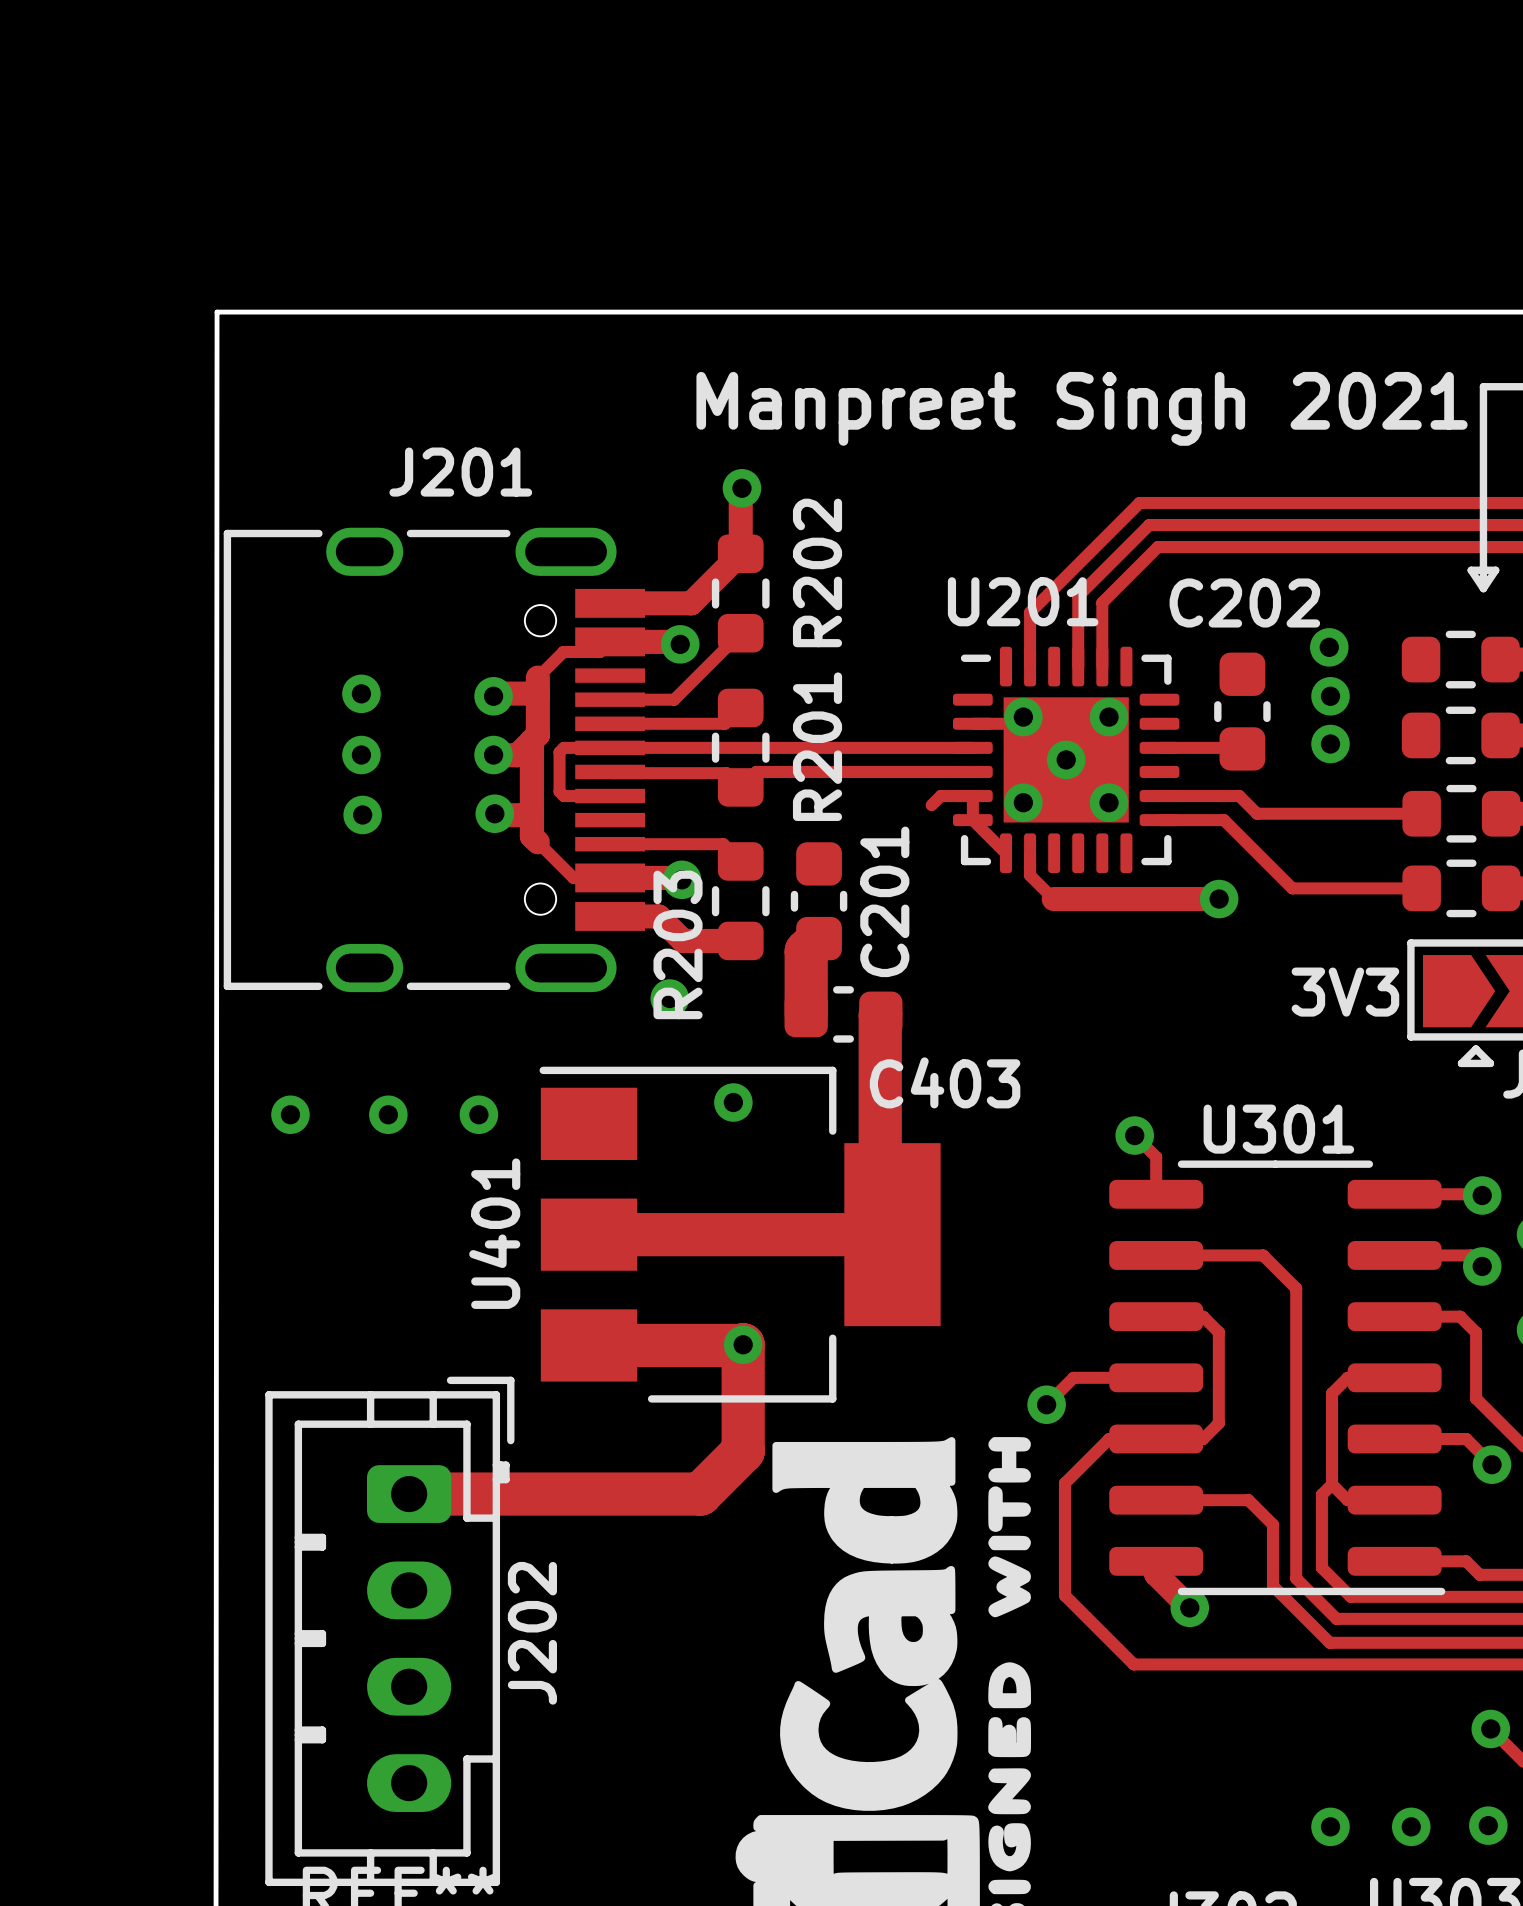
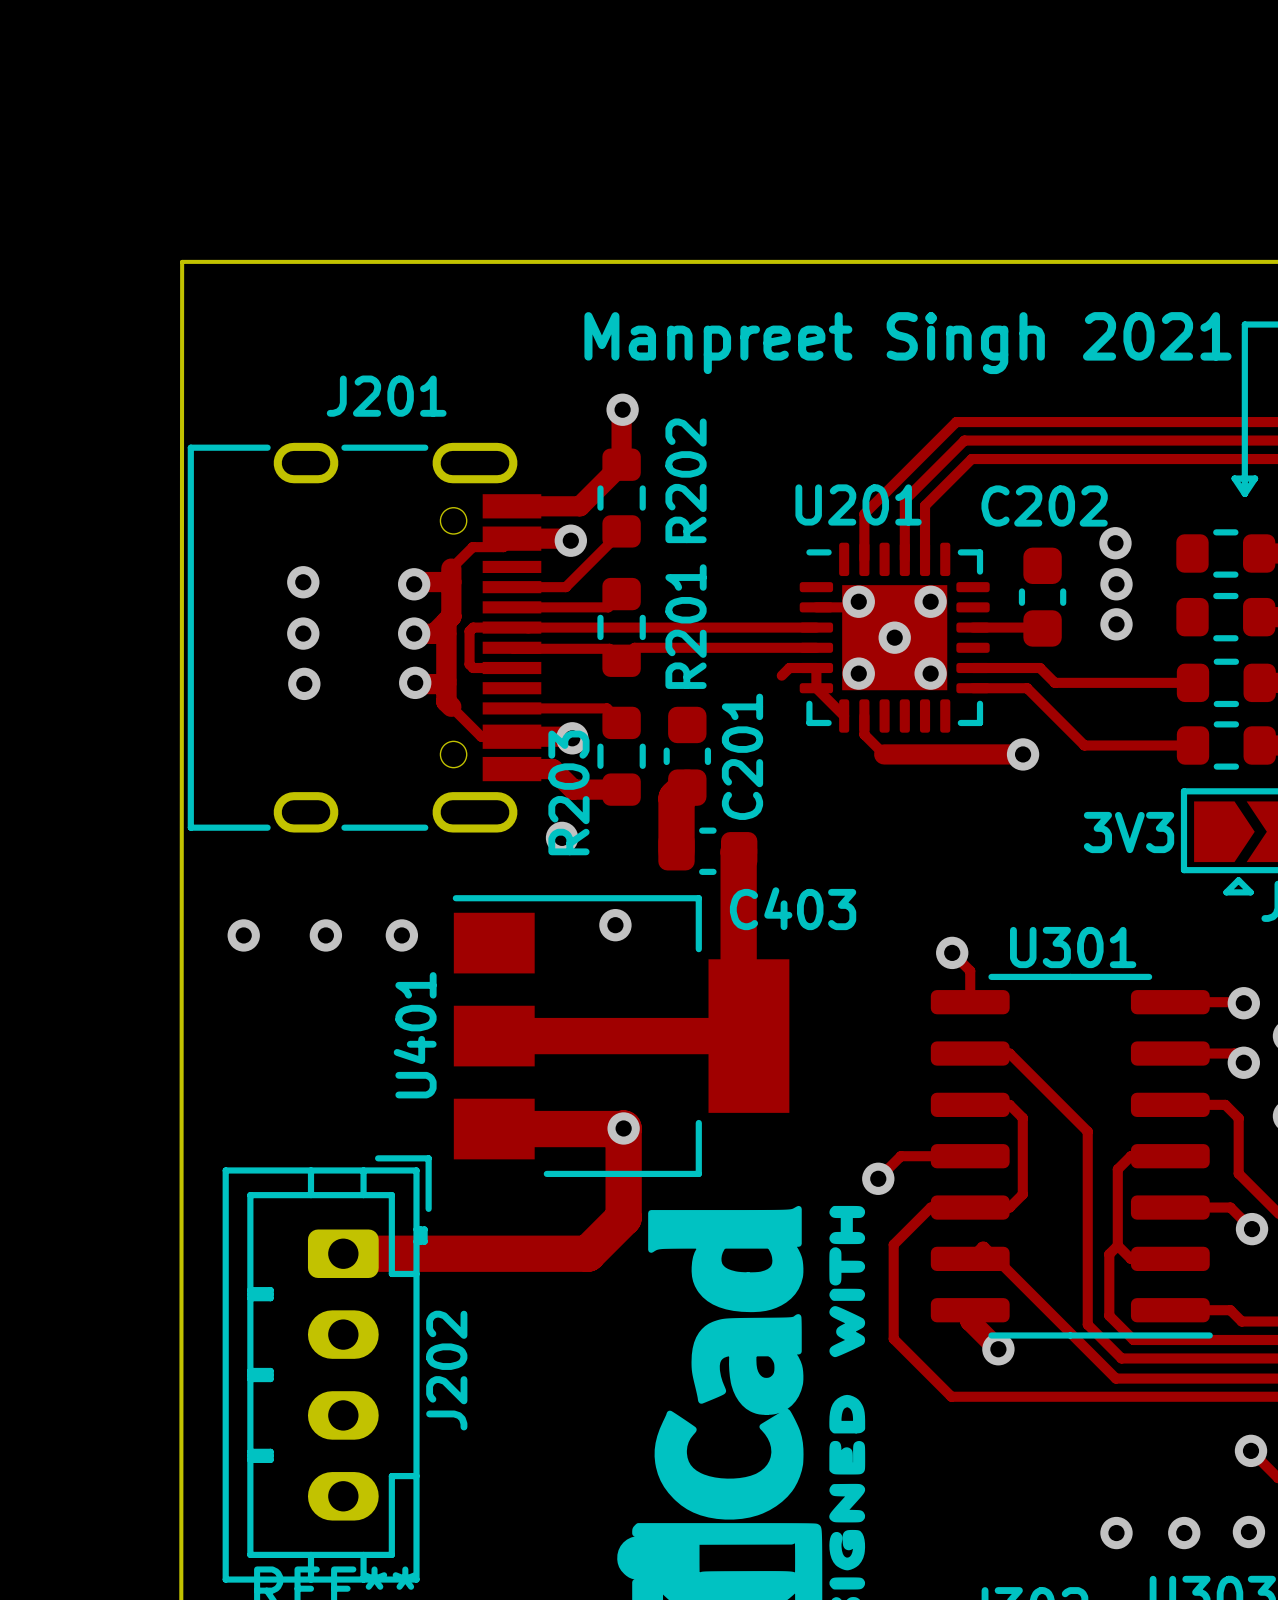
track: (1203, 1255) (1263, 1255) (1296, 1288) (1296, 1348) -> (1009, 1053) (1087, 1131)
track: (1156, 1500) (1248, 1500) (1272, 1524) (1272, 1585) -> (970, 1258) (984, 1246) (1068, 1330)

